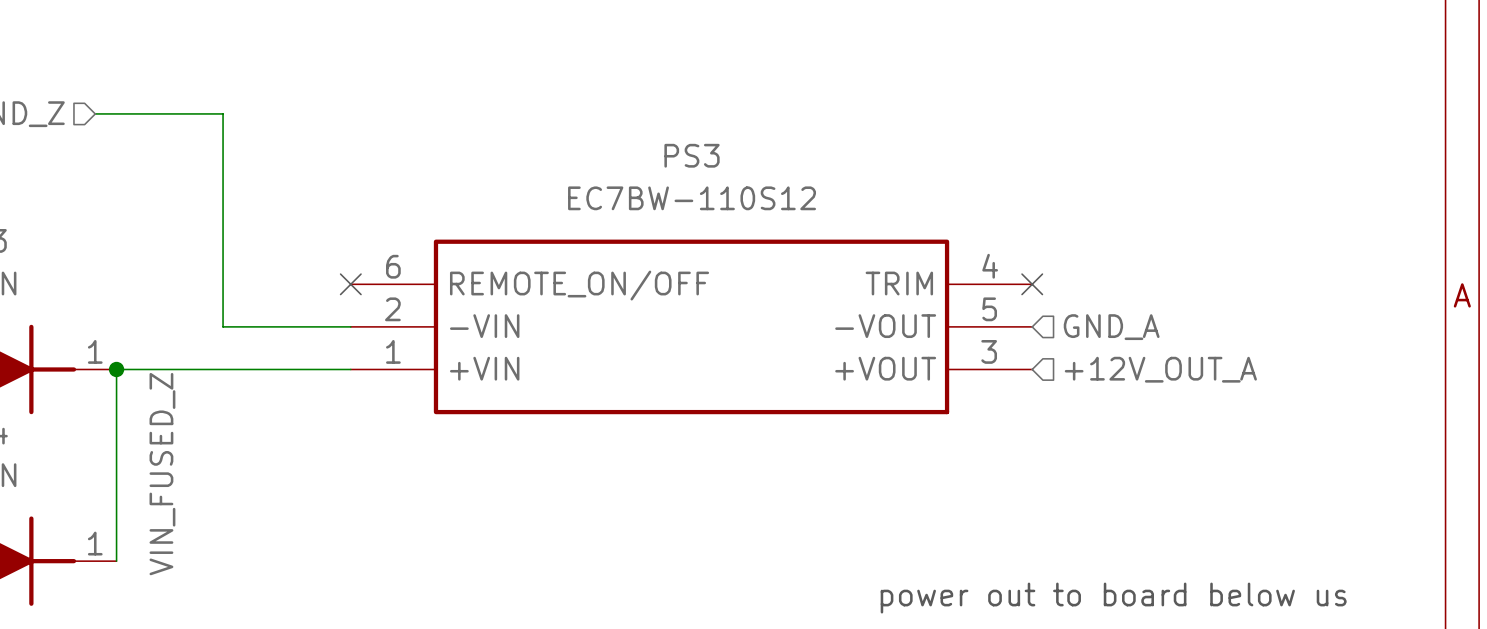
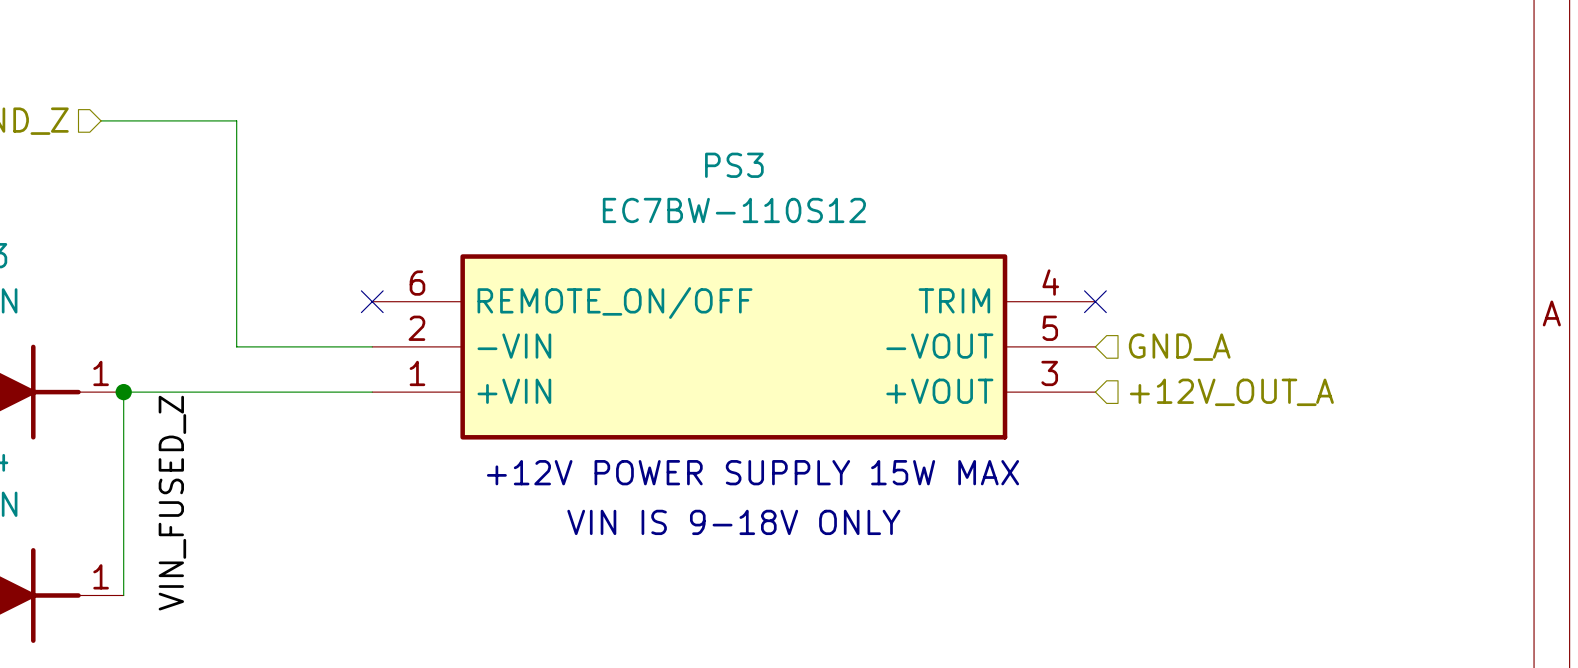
text: none -> +12V POWER SUPPLY 15W MAX (753, 472)
text: none -> VIN IS 9-18V ONLY (733, 522)
text: power out to board below us (1113, 598) -> none

